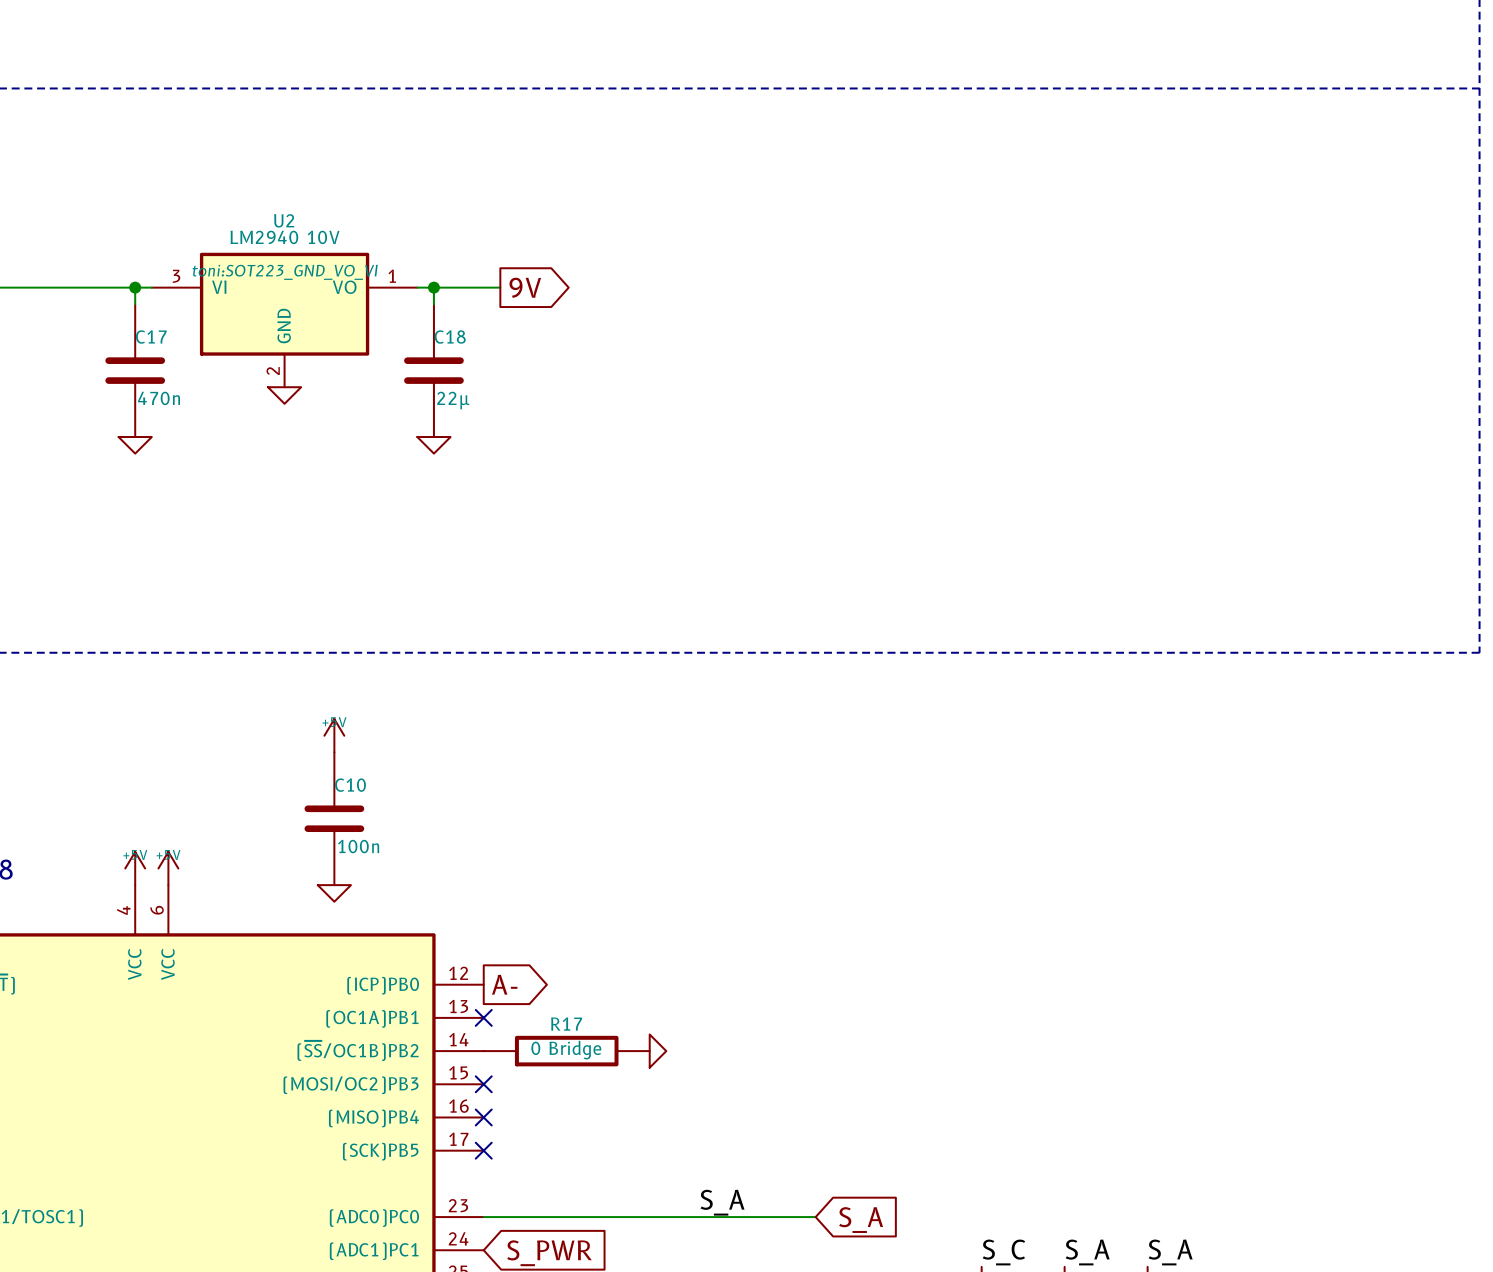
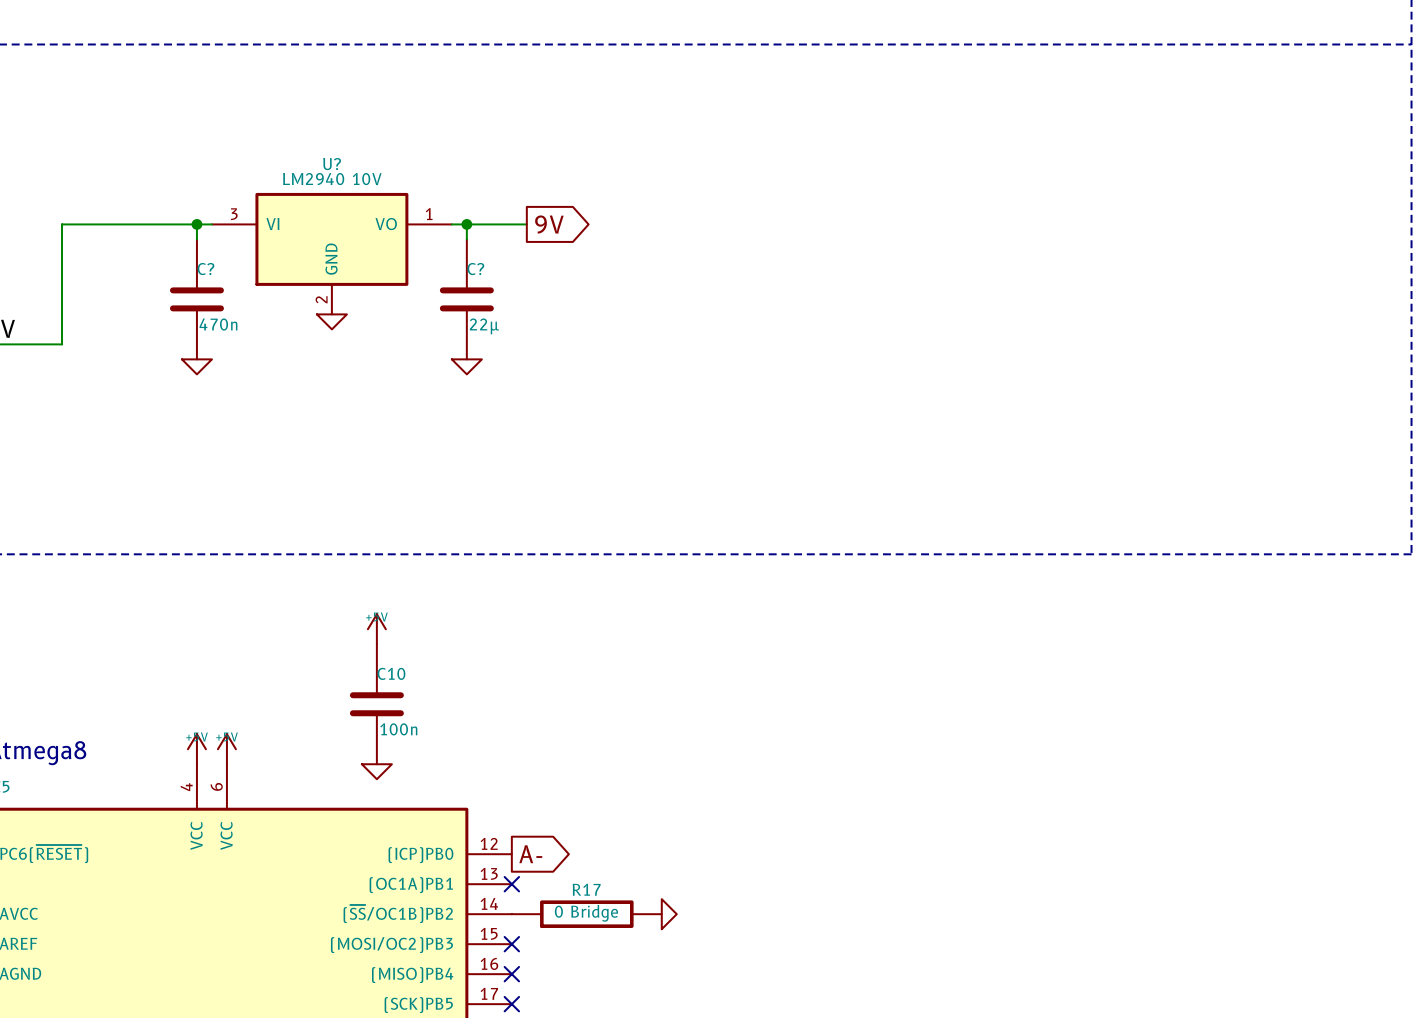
U2 name: U2 (284, 220) -> U? (332, 164)
U2 text: toni:SOT223_GND_VO_VI (285, 272) -> none
C17 name: C17 (151, 337) -> C? (205, 269)
C18 name: C18 (450, 337) -> C? (475, 269)

